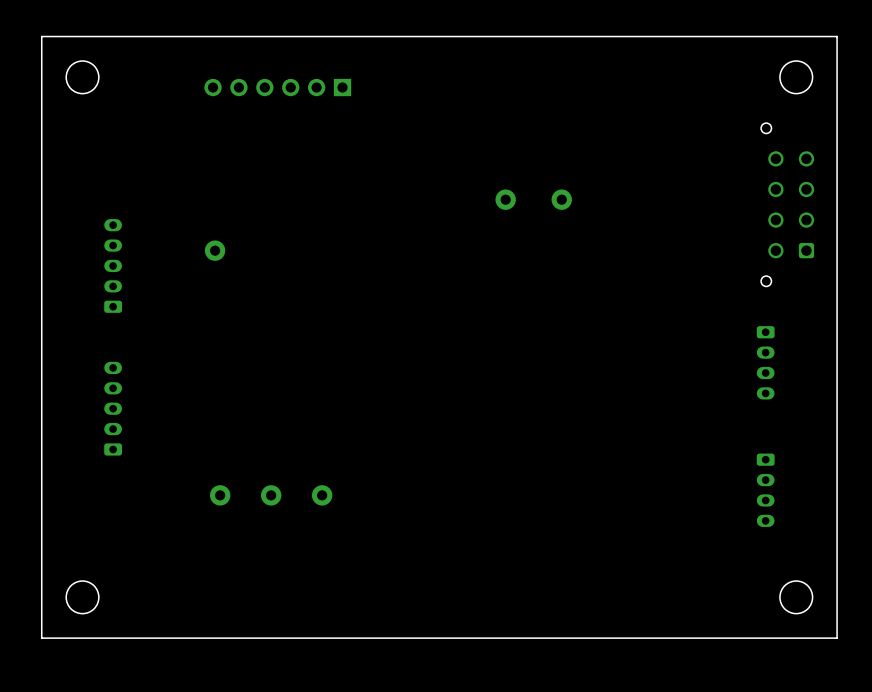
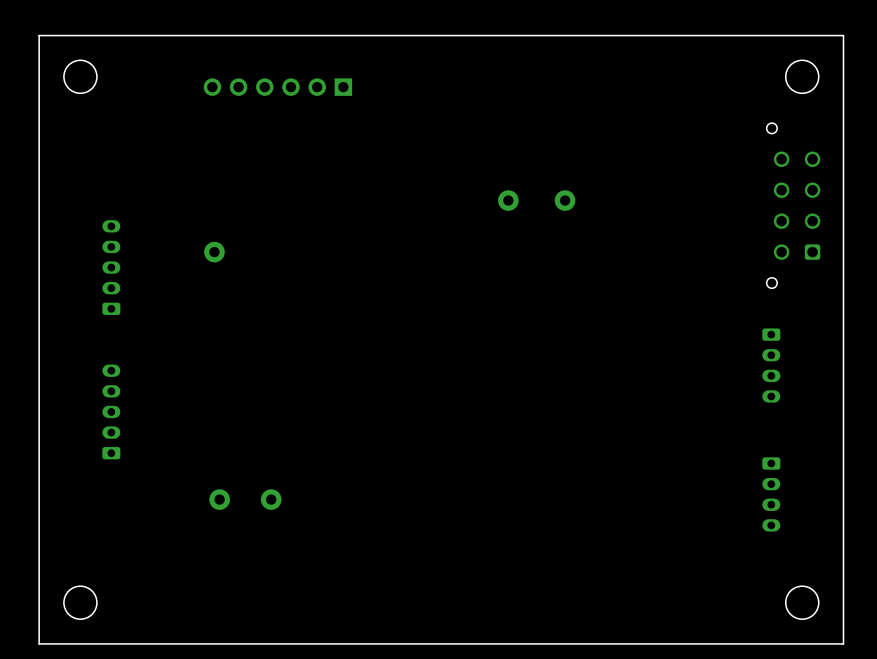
part: (322, 495) -> none

